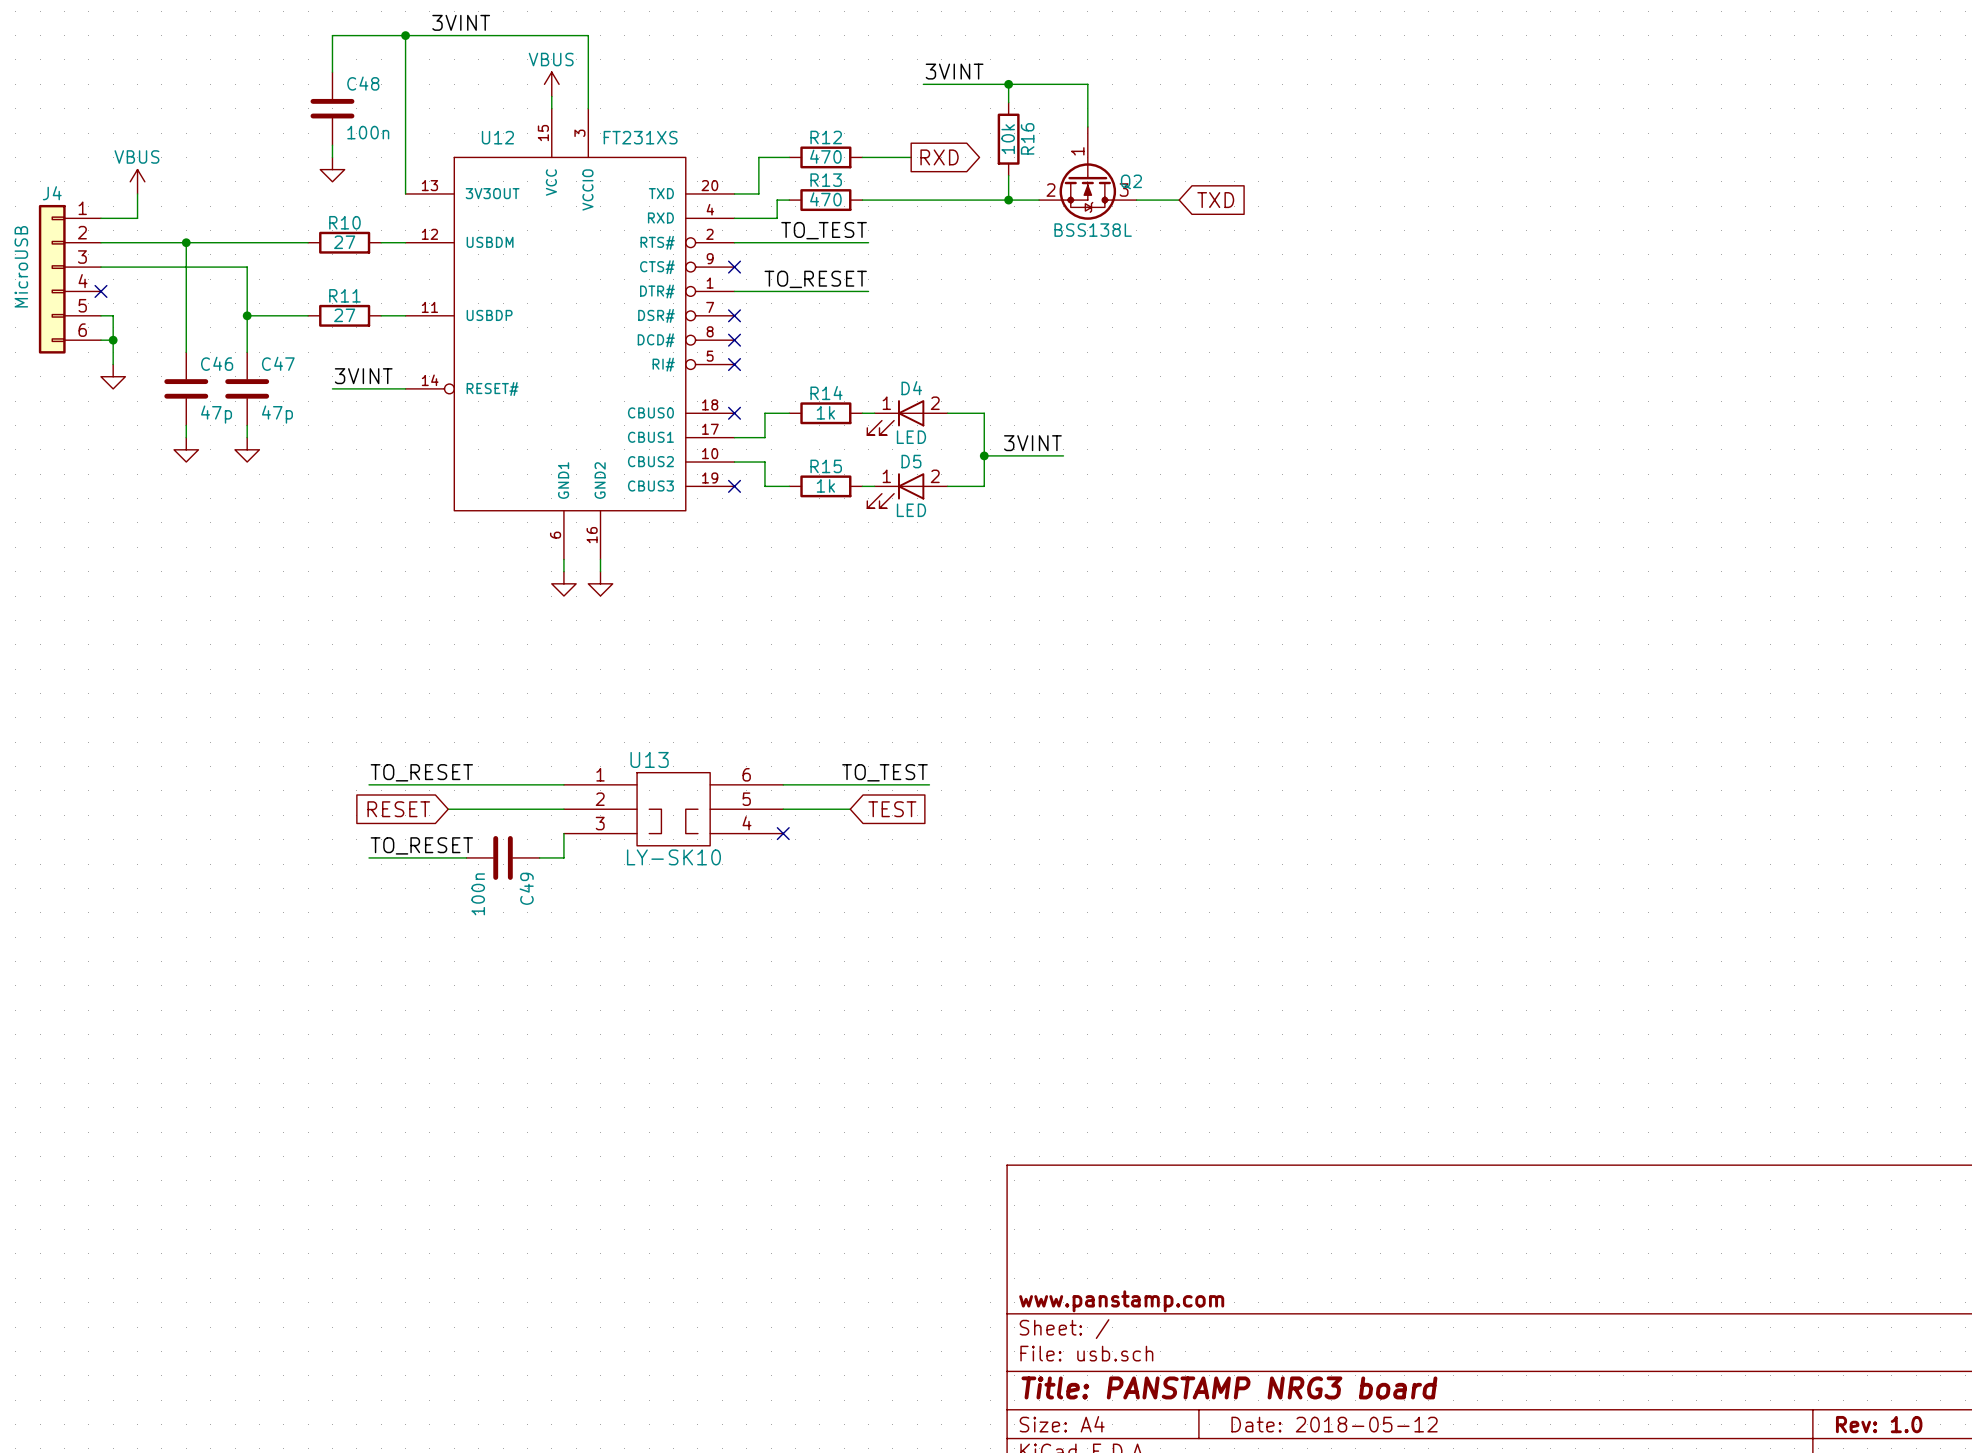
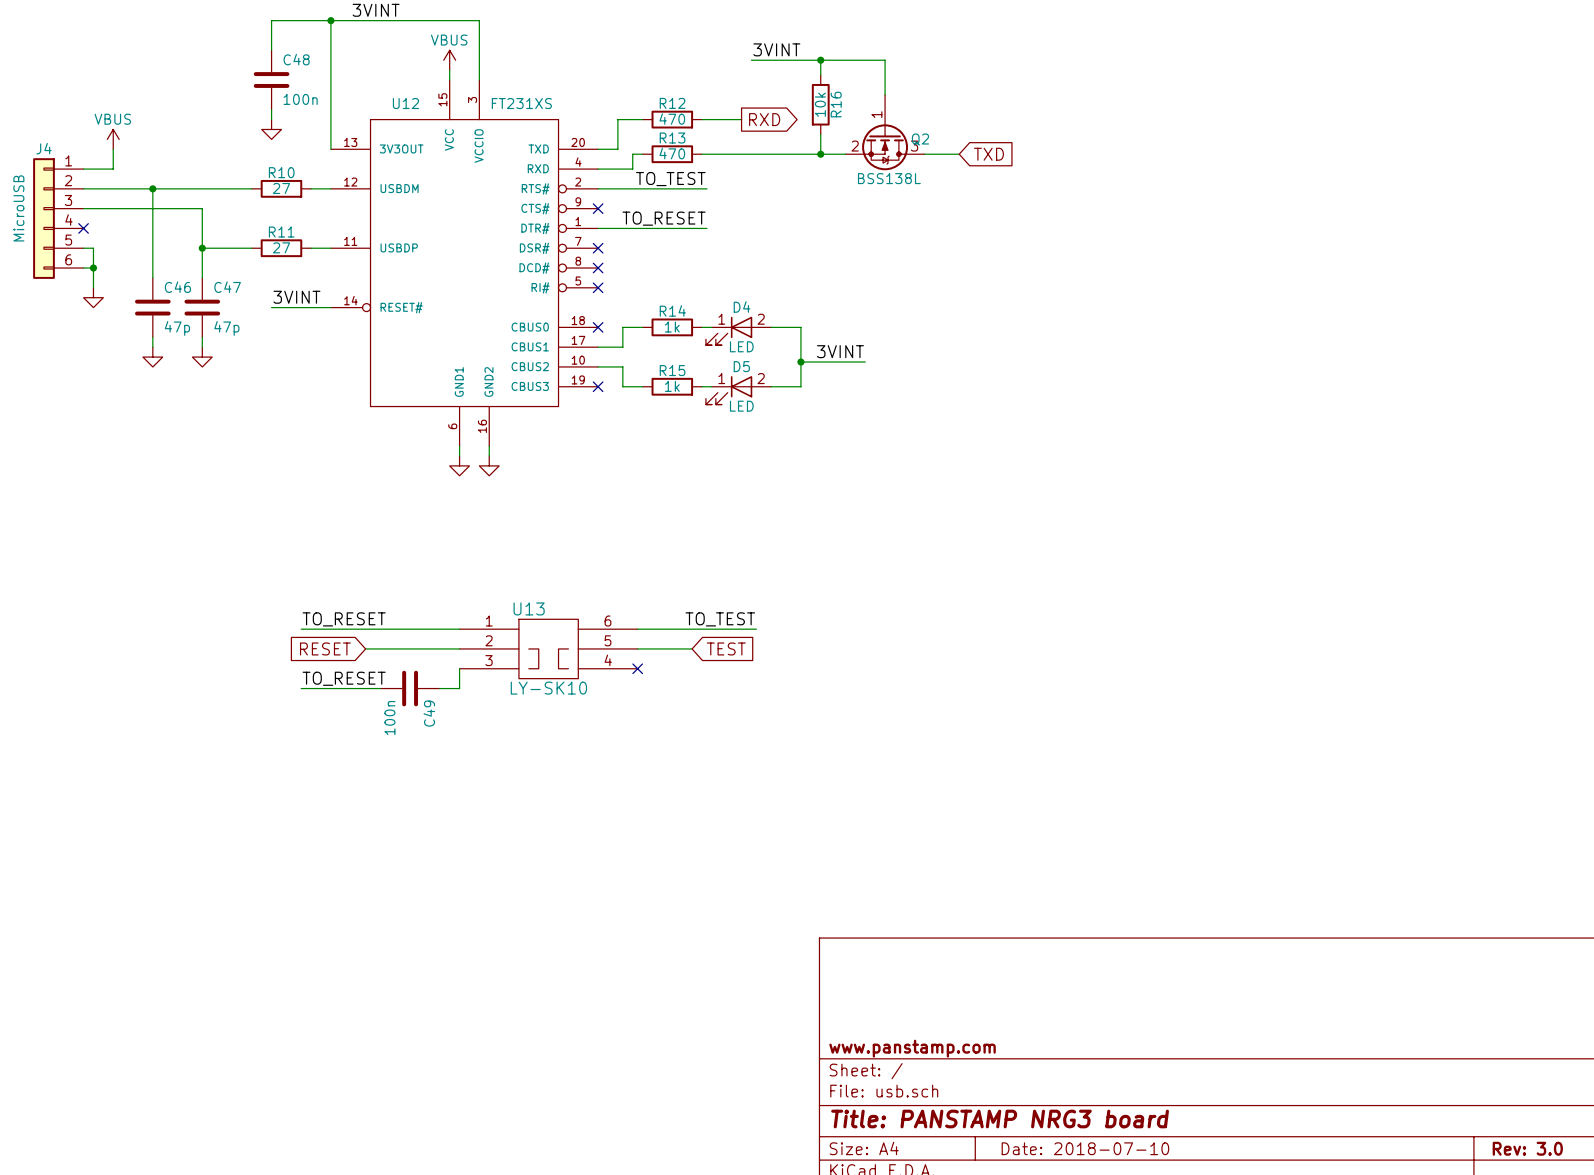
title block: Date: 2018-05-12 (1334, 1424) -> Date: 2018-07-10 (1085, 1148)
title block: Rev: 1.0 (1879, 1424) -> Rev: 3.0 (1527, 1148)

